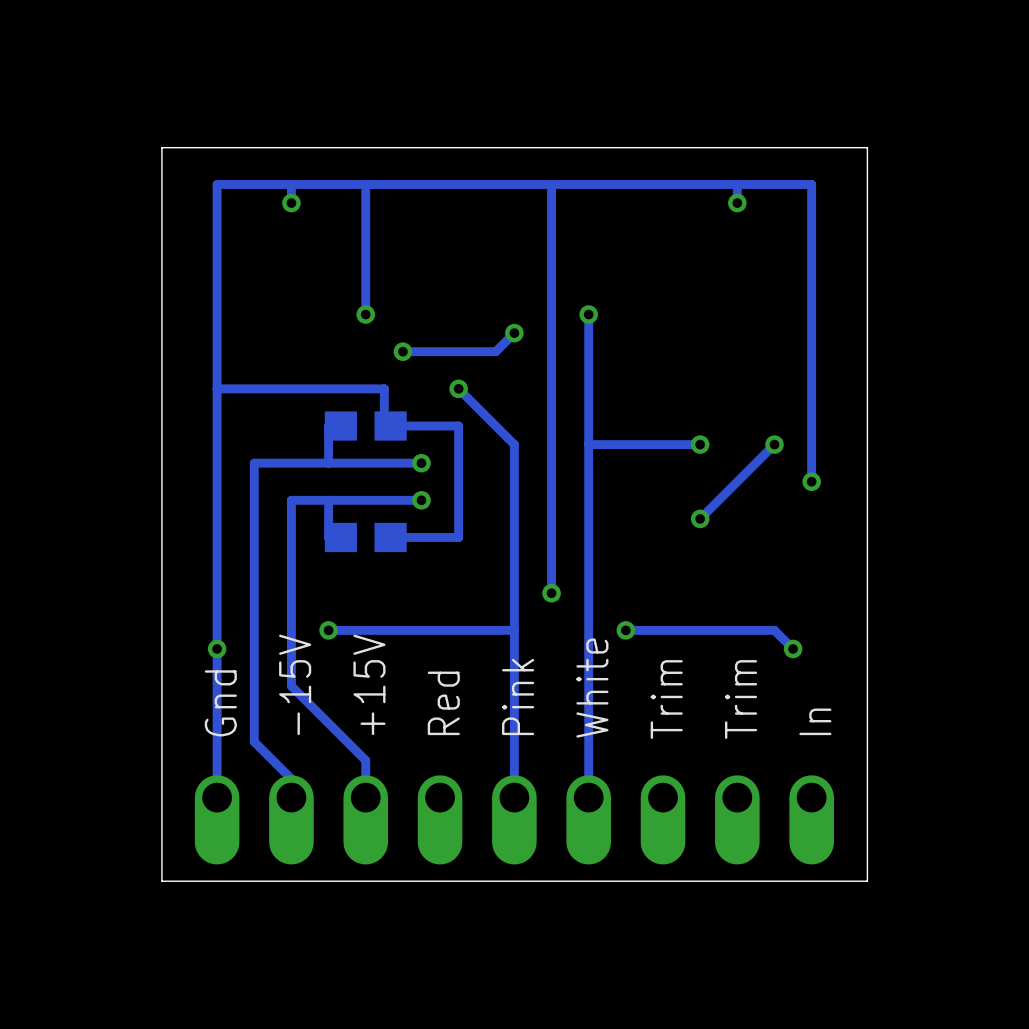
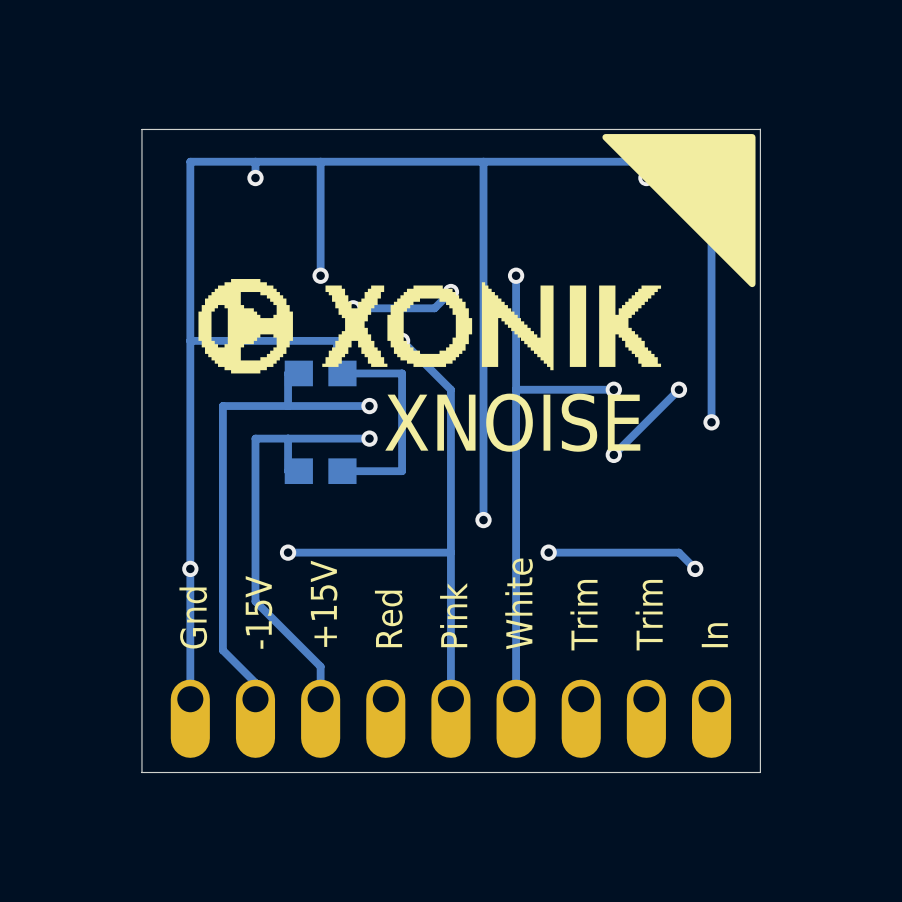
drawing: none -> [322, 134, 756, 371]
drawing: none -> [198, 278, 293, 374]
text: none -> XNOISE (512, 422)

